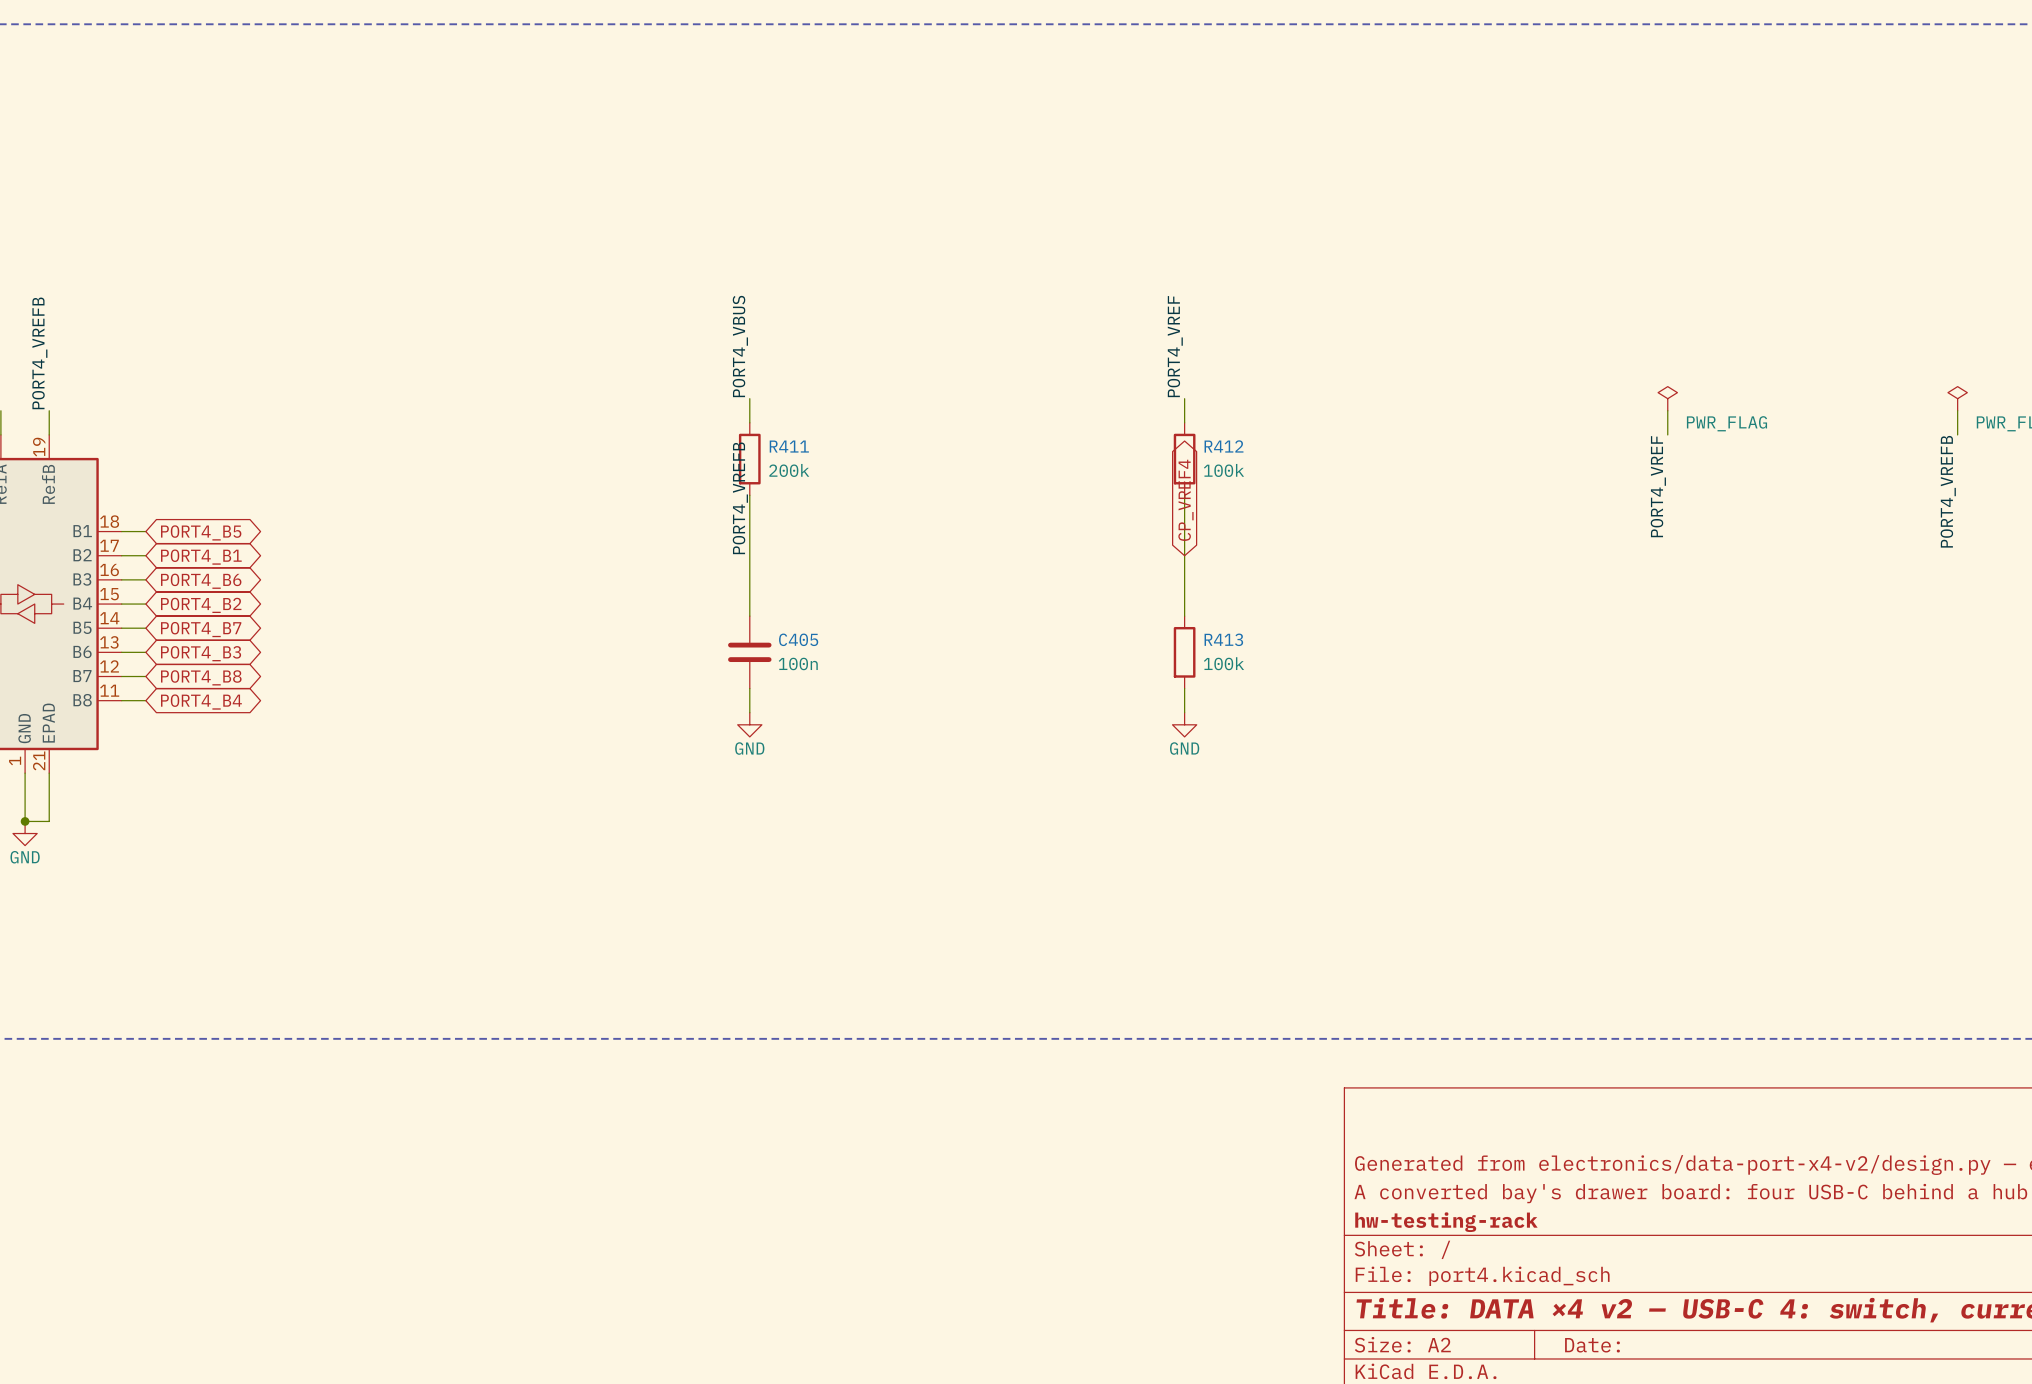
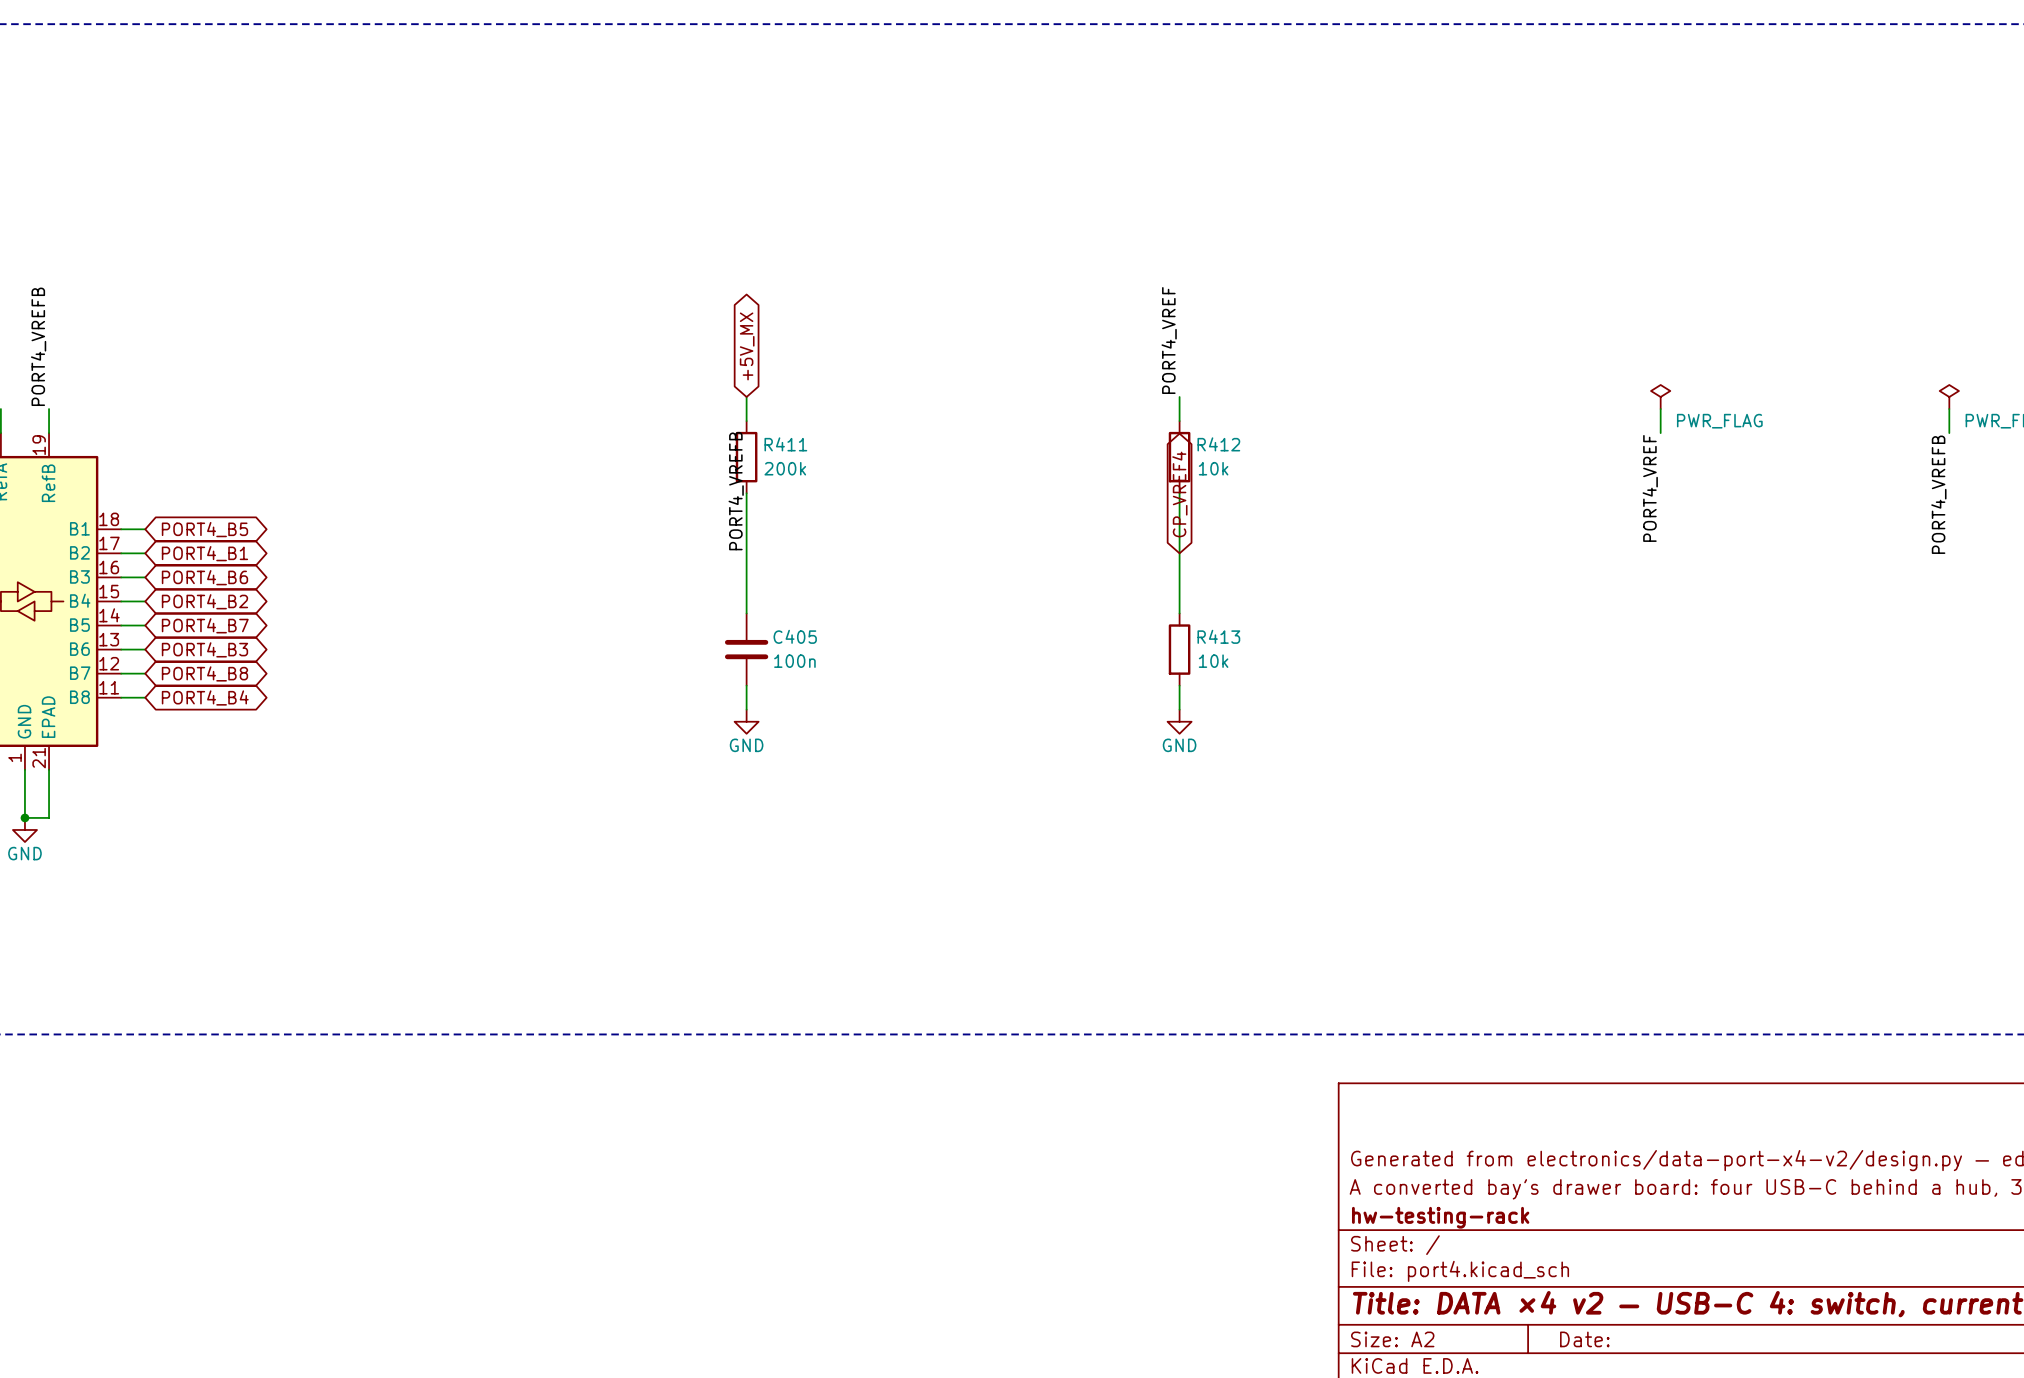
label: PORT4_VBUS (740, 346) -> none
global label: none -> +5V_MX (747, 346)
R412 value: 100k (1224, 470) -> 10k (1213, 468)
R413 value: 100k (1224, 663) -> 10k (1213, 661)

